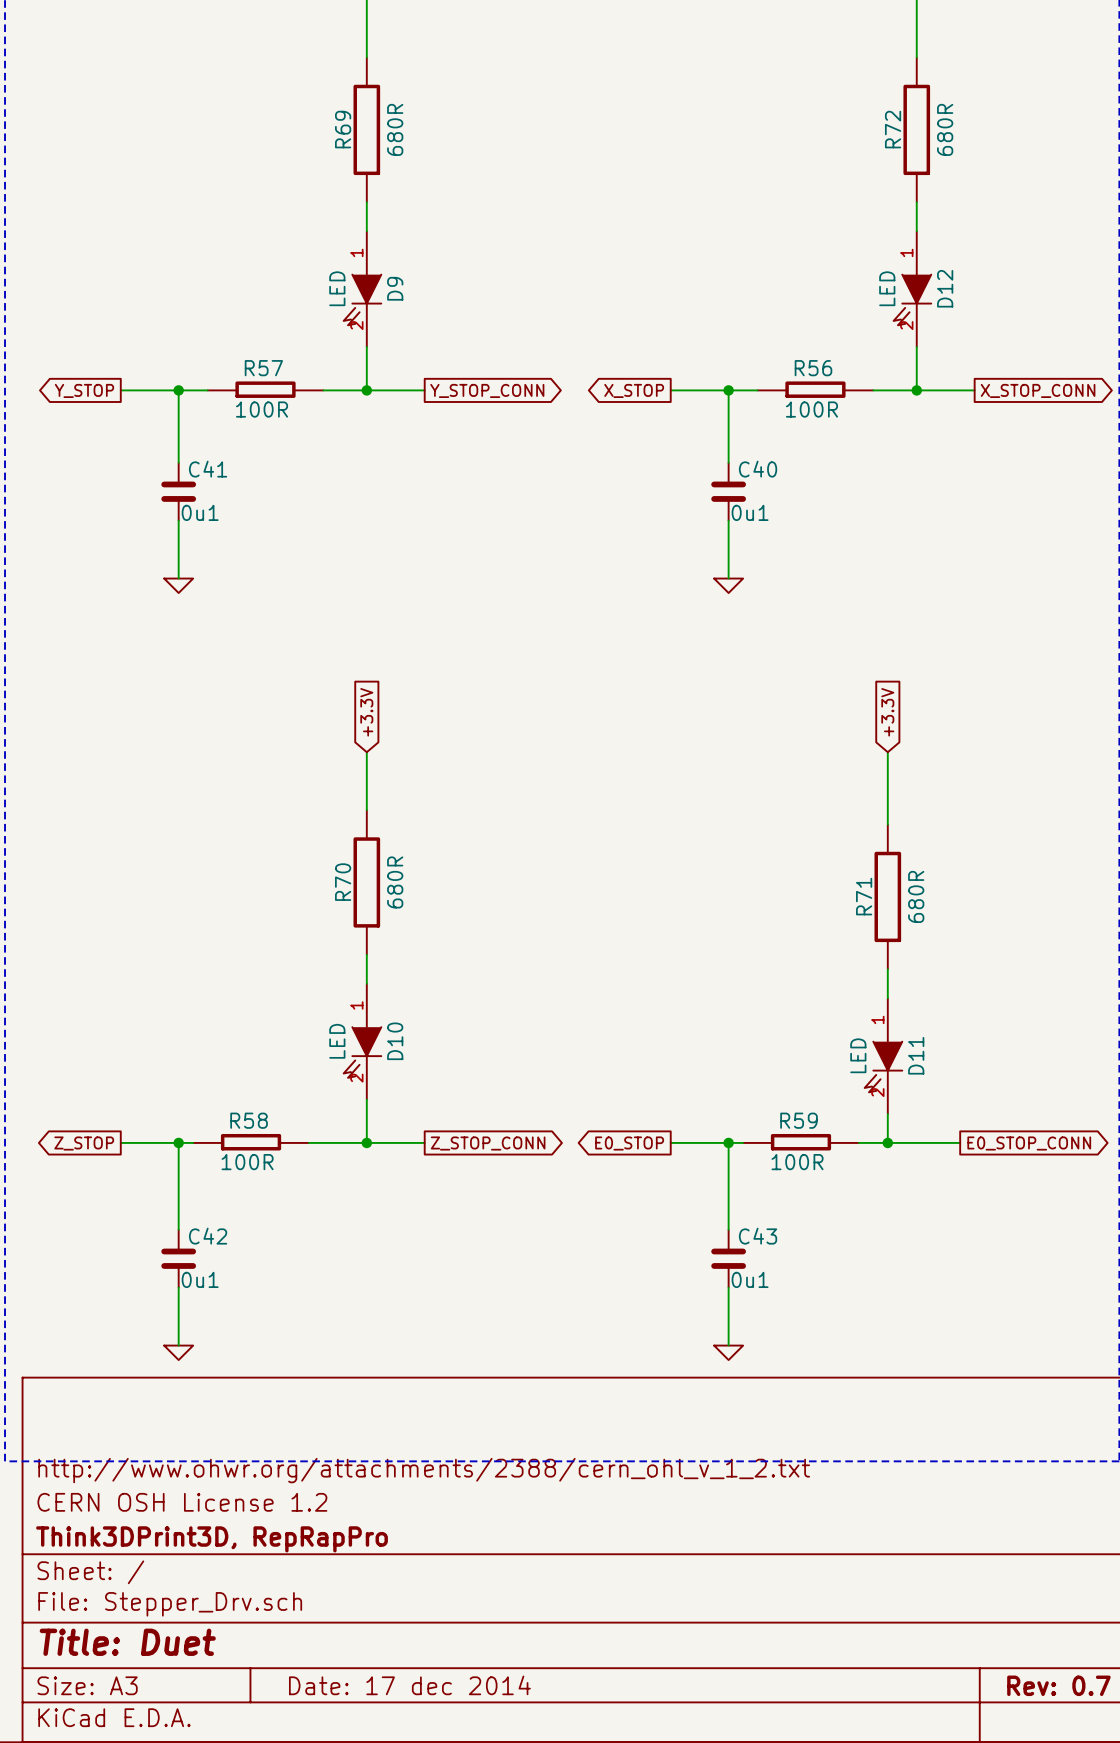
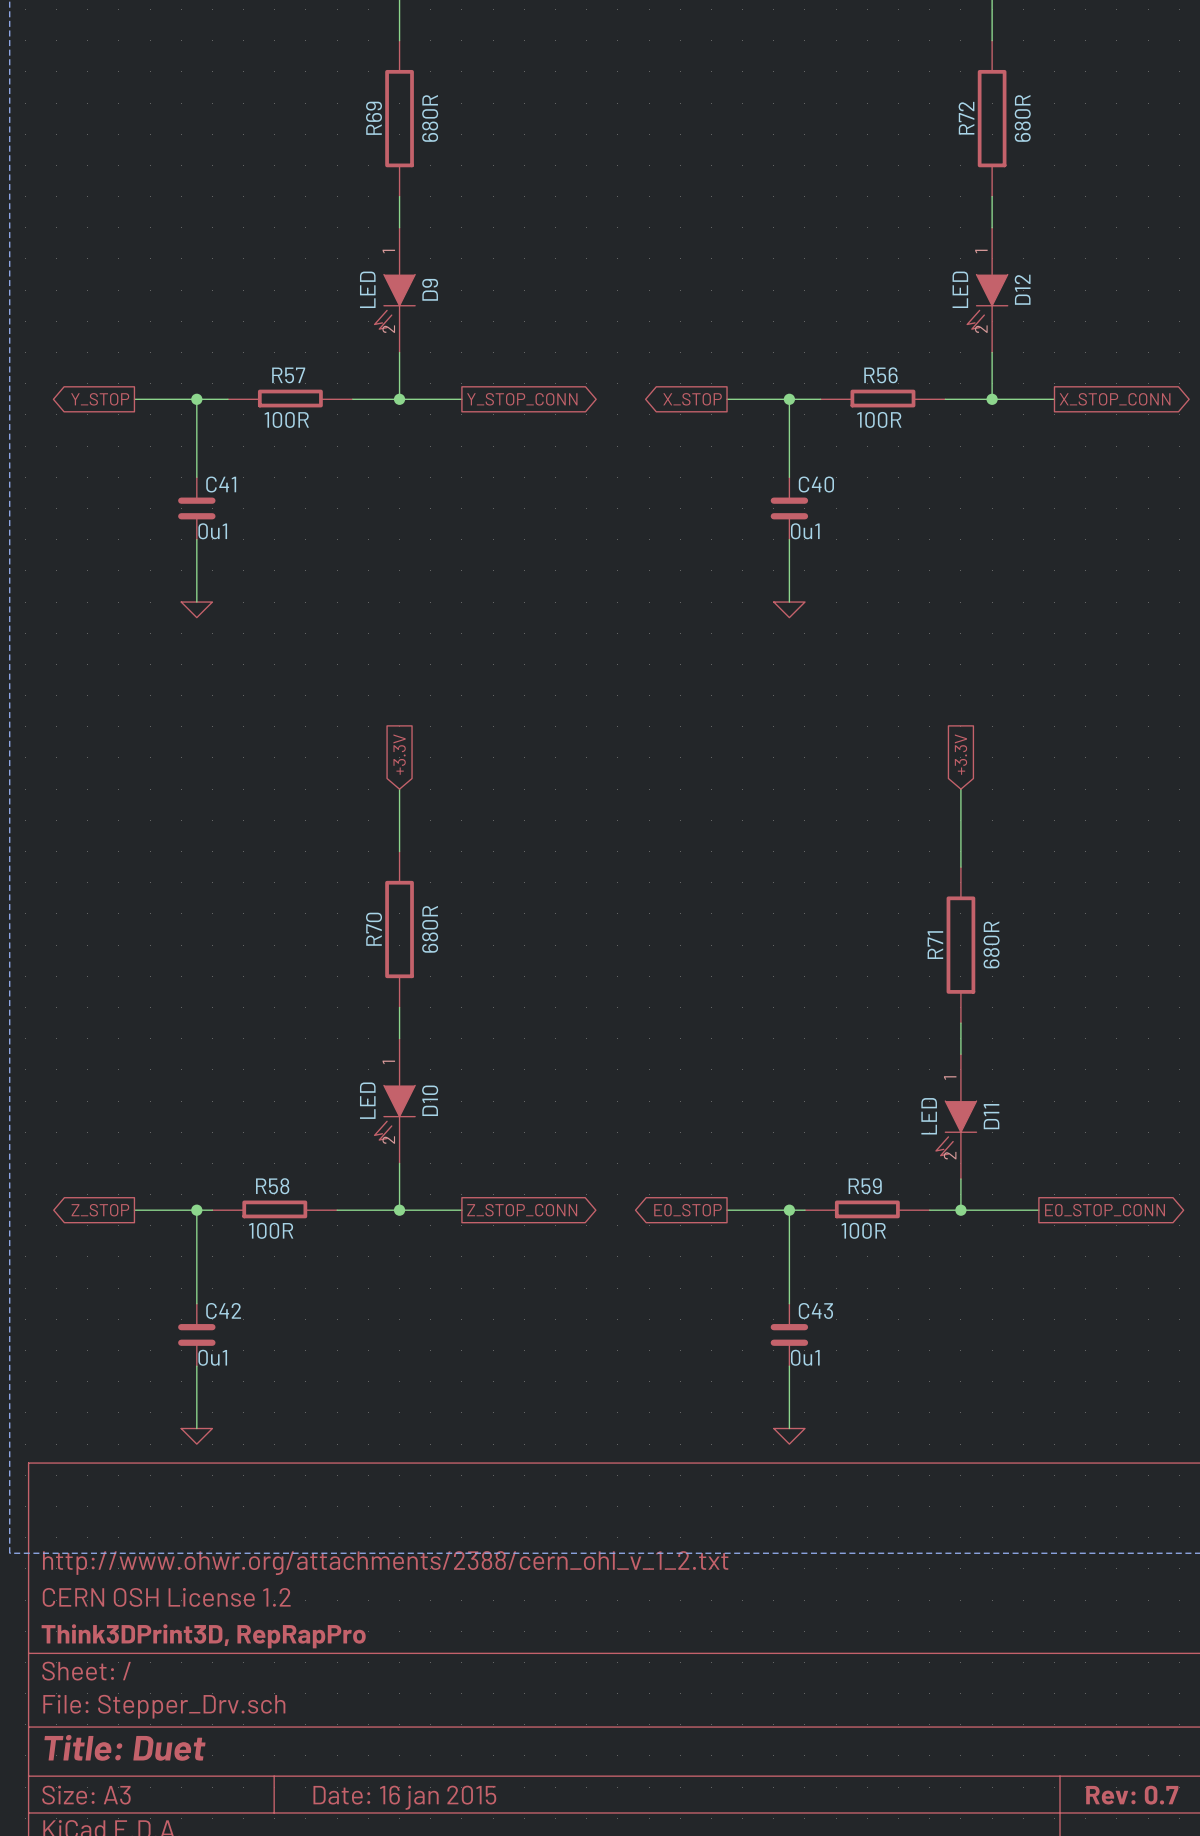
title block: Date: 17 dec 2014 (409, 1685) -> Date: 16 jan 2015 (404, 1797)

